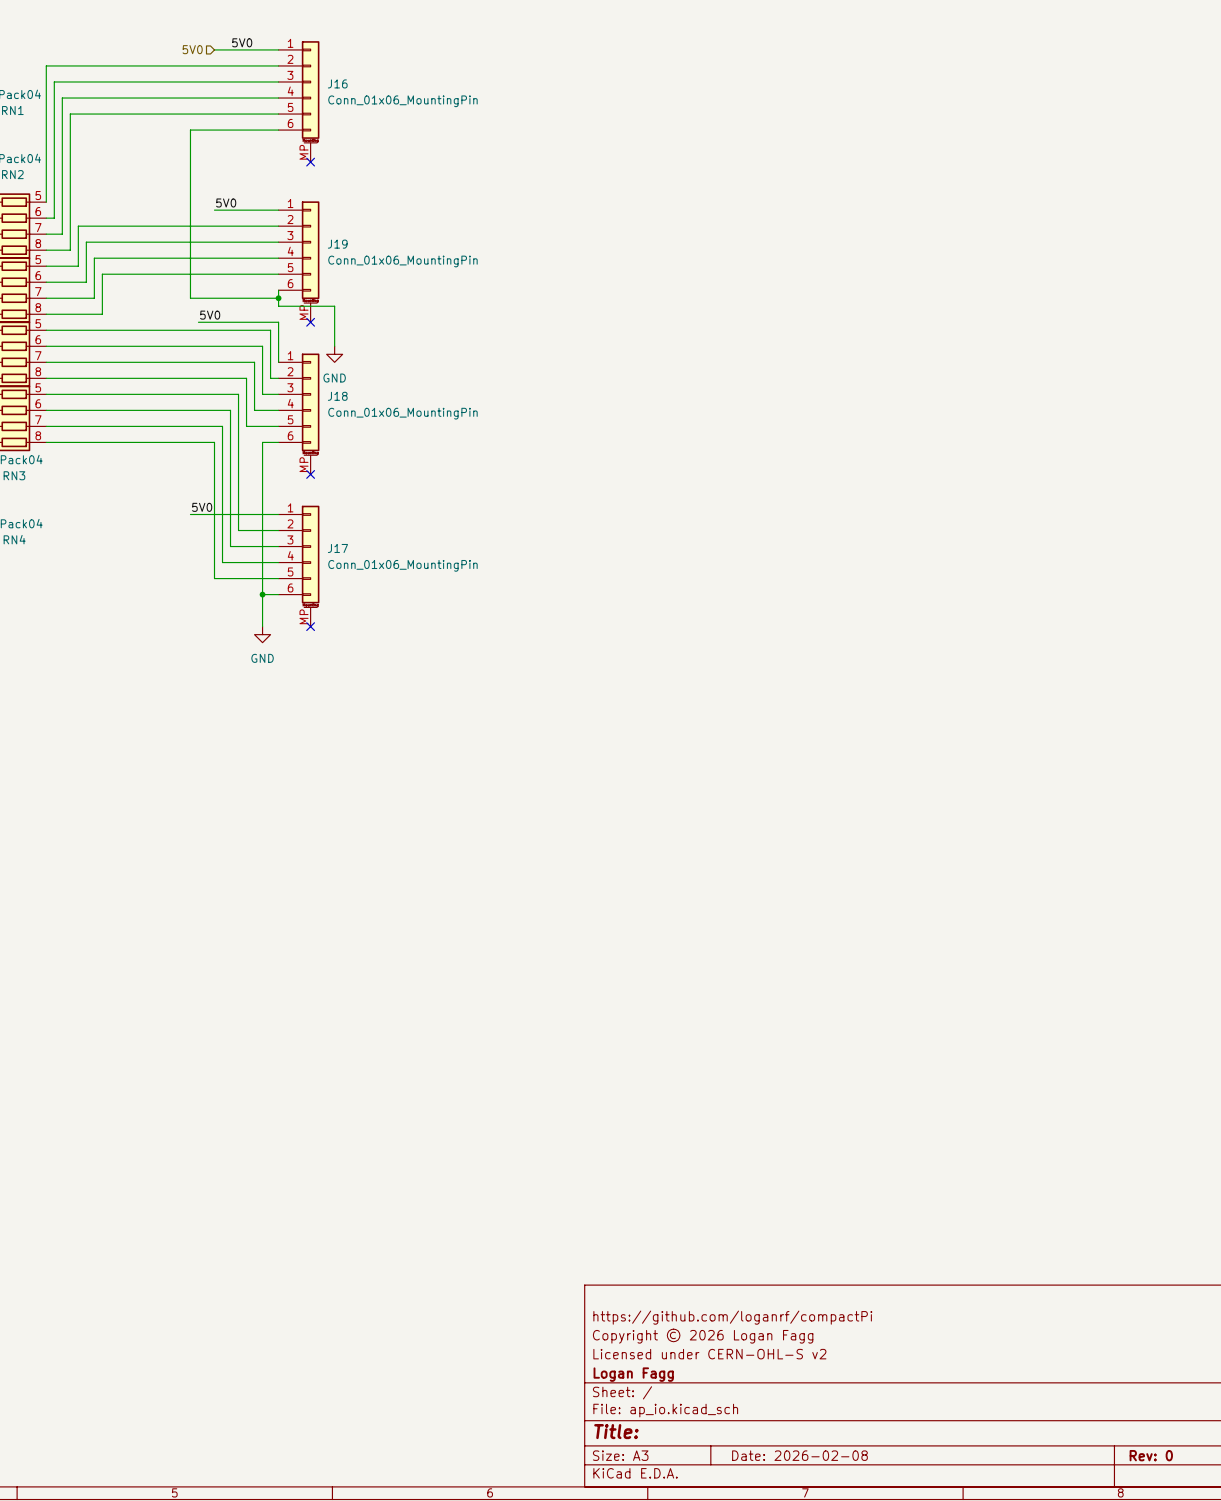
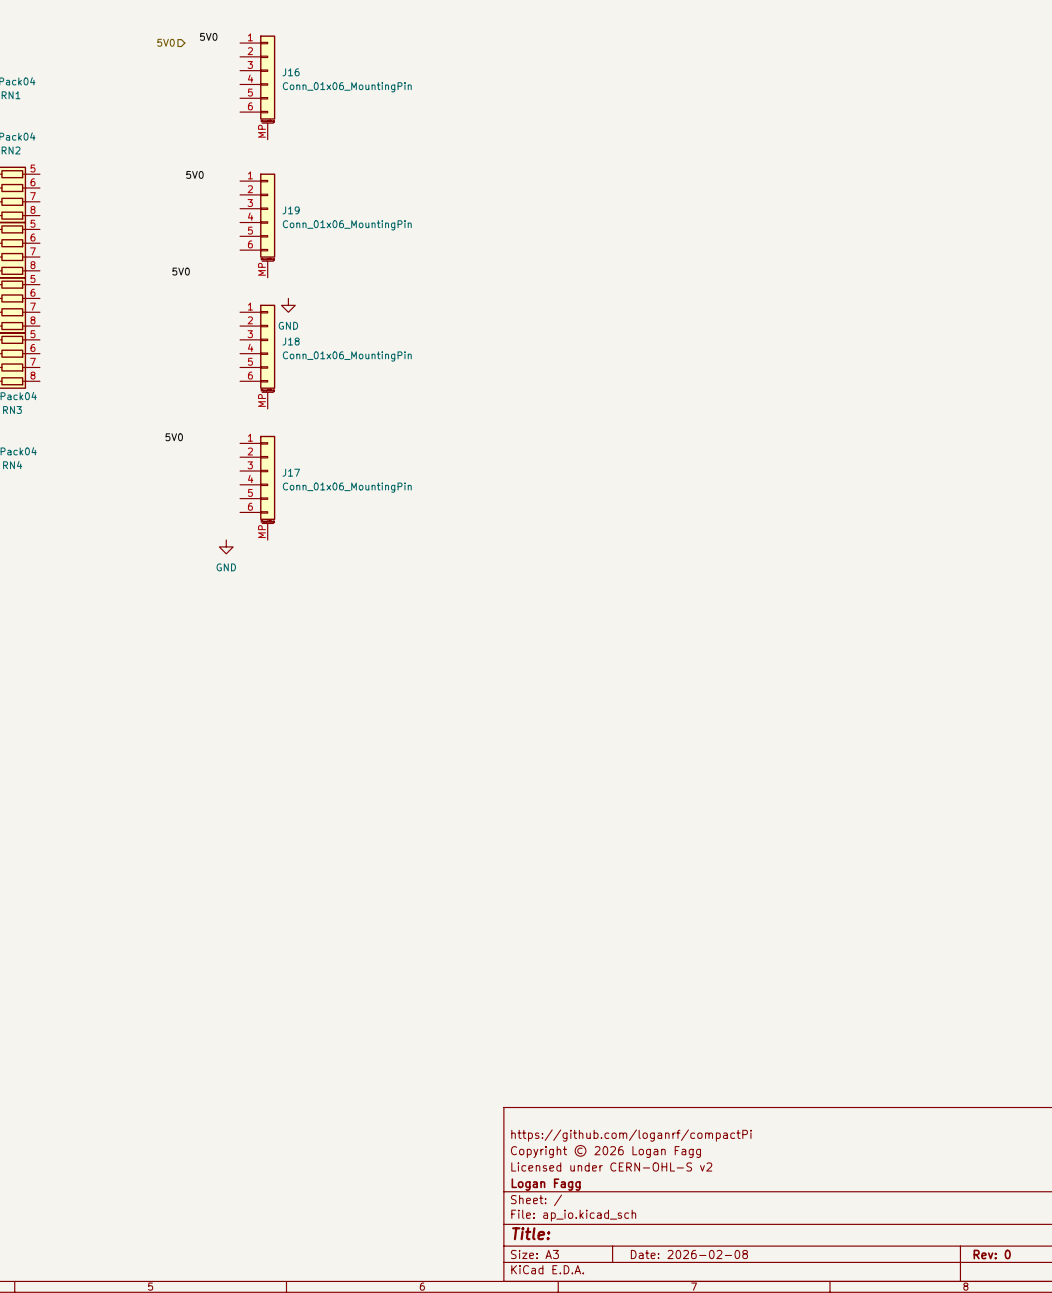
wire: (214, 49) (278, 49) -> none
wire: (278, 65) (46, 65) (46, 202) -> none
wire: (278, 81) (54, 81) (54, 218) (46, 218) -> none
wire: (278, 98) (62, 98) (62, 234) (46, 234) -> none
wire: (278, 114) (70, 114) (70, 250) (46, 250) -> none
wire: (278, 130) (190, 130) (190, 298) (278, 298) -> none
no-connect mark: (310, 162) -> none
wire: (214, 210) (278, 210) -> none
wire: (278, 226) (78, 226) (78, 266) (46, 266) -> none
wire: (278, 242) (86, 242) (86, 282) (46, 282) -> none
wire: (278, 258) (94, 258) (94, 298) (46, 298) -> none
wire: (278, 274) (102, 274) (102, 314) (46, 314) -> none
wire: (278, 290) (278, 306) (334, 306) (334, 346) -> none
junction: (278, 298) -> none
wire: (198, 322) (278, 322) (278, 362) -> none
no-connect mark: (310, 322) -> none
wire: (46, 330) (270, 330) (270, 378) (278, 378) -> none
wire: (46, 346) (262, 346) (262, 394) (278, 394) -> none
wire: (46, 362) (254, 362) (254, 410) (278, 410) -> none
wire: (46, 378) (246, 378) (246, 426) (278, 426) -> none
wire: (46, 394) (238, 394) (238, 530) (278, 530) -> none
wire: (46, 410) (230, 410) (230, 546) (278, 546) -> none
wire: (46, 426) (222, 426) (222, 562) (278, 562) -> none
wire: (46, 442) (214, 442) (214, 578) (278, 578) -> none
wire: (278, 442) (262, 442) (262, 626) -> none
no-connect mark: (310, 474) -> none
wire: (190, 514) (278, 514) -> none
wire: (262, 594) (278, 594) -> none
junction: (262, 594) -> none
no-connect mark: (310, 626) -> none

